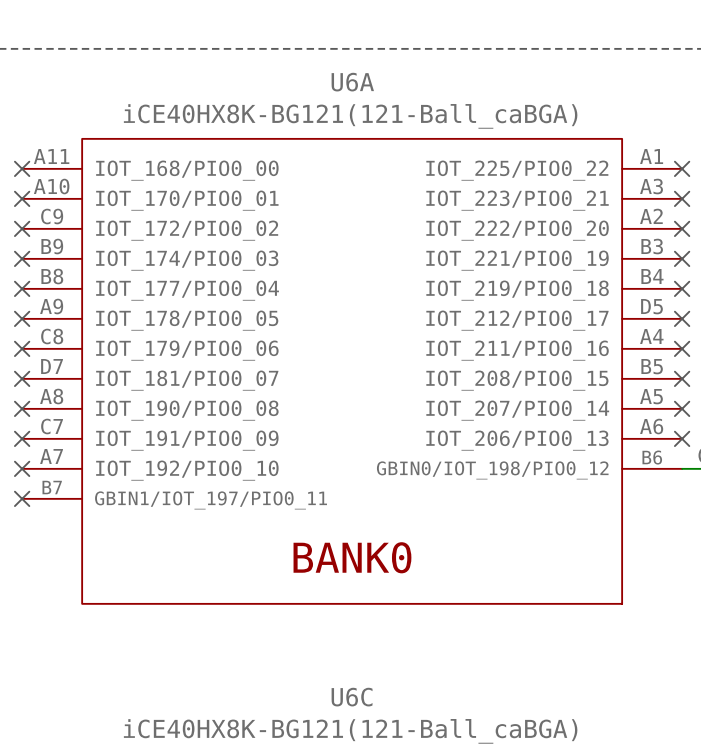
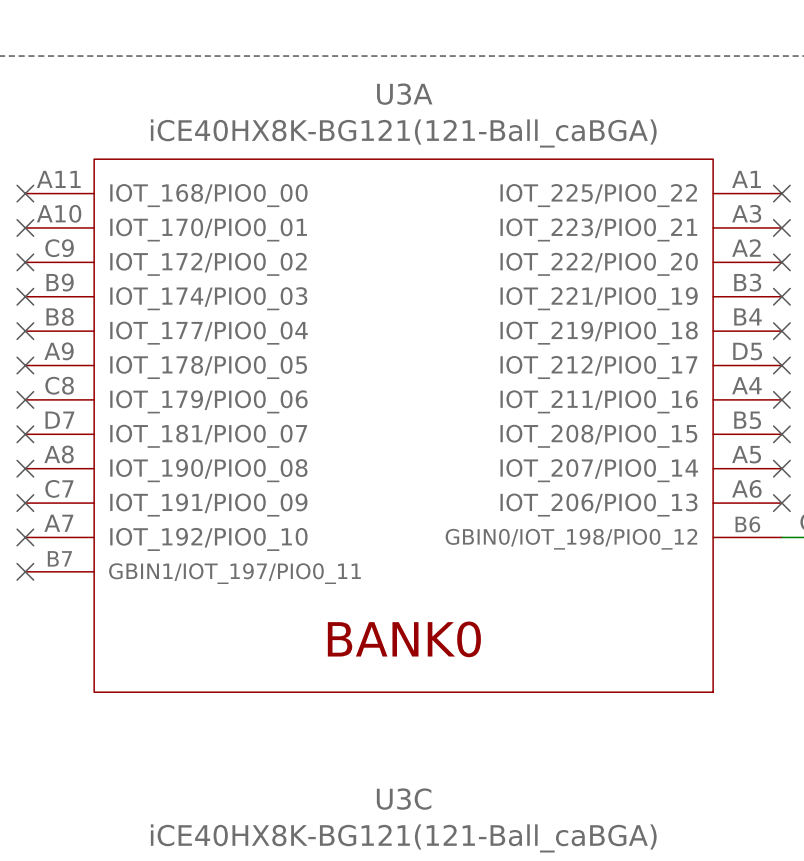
U6A name: U6A (352, 82) -> U3A (404, 94)
U6C name: U6C (352, 697) -> U3C (404, 799)

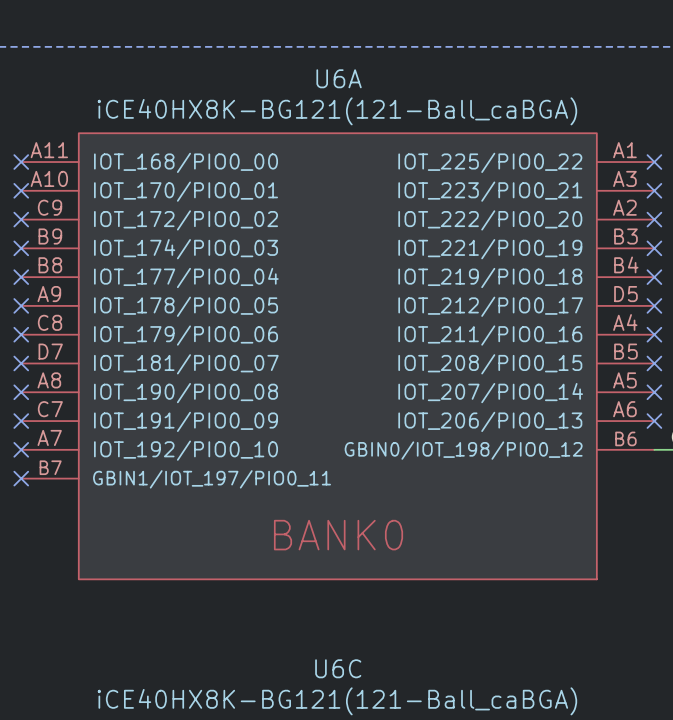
U3A name: U3A (404, 94) -> U6A (339, 78)
U3C name: U3C (404, 799) -> U6C (338, 668)

